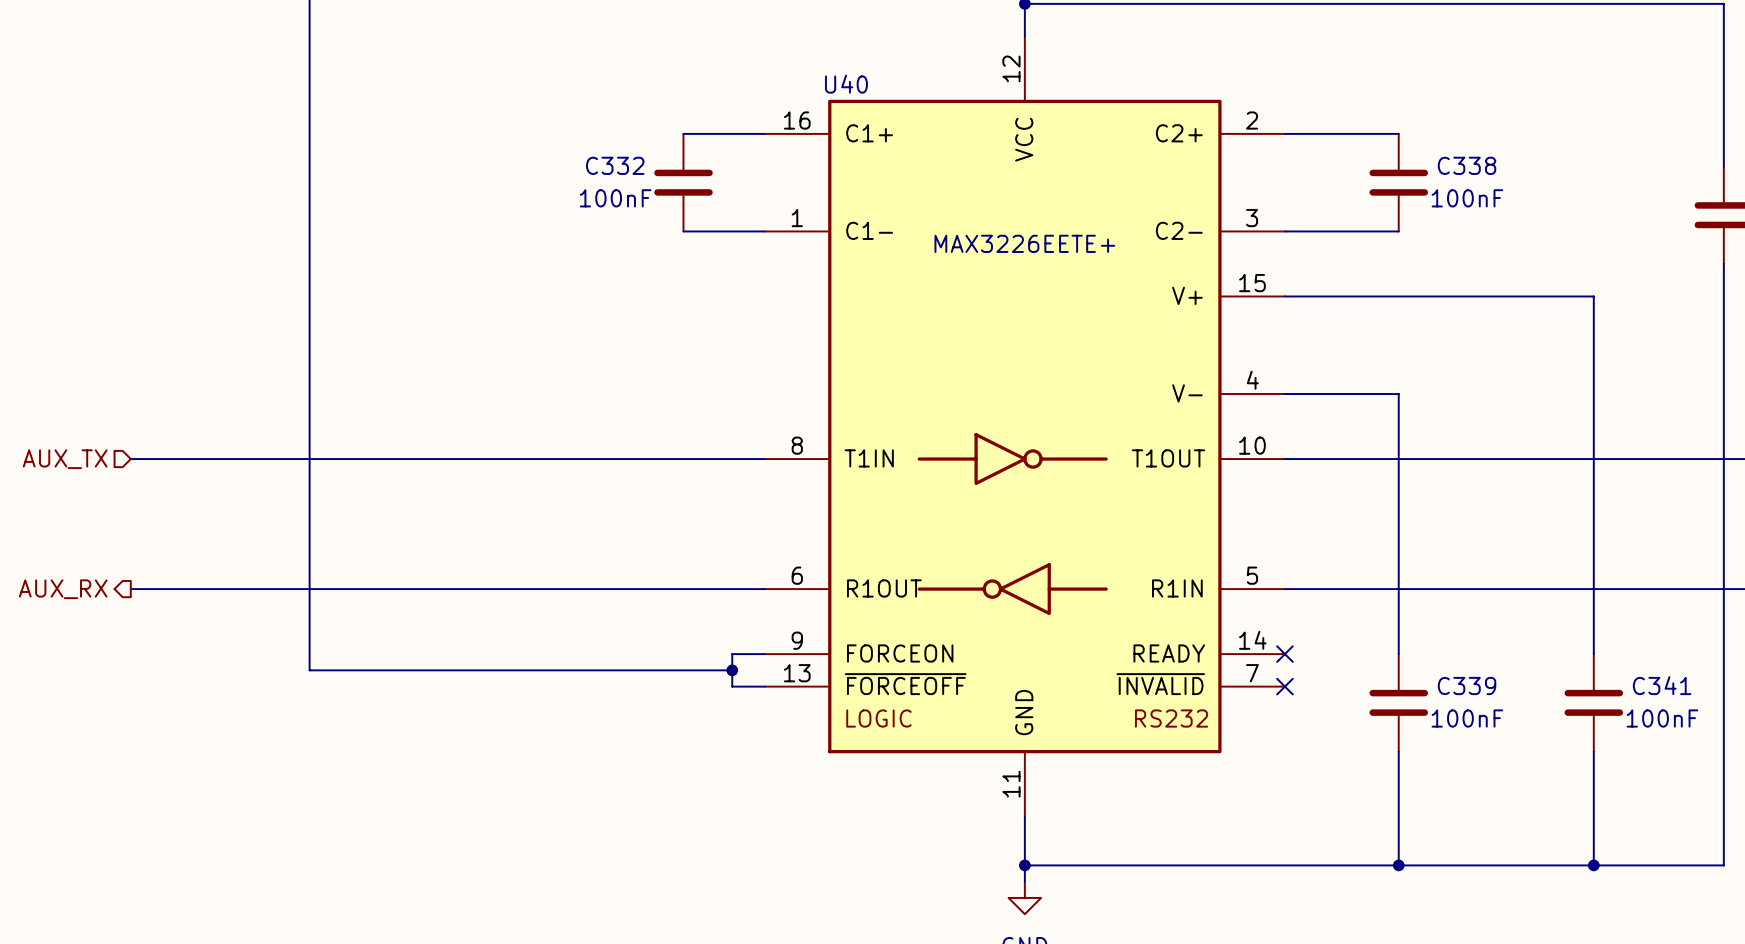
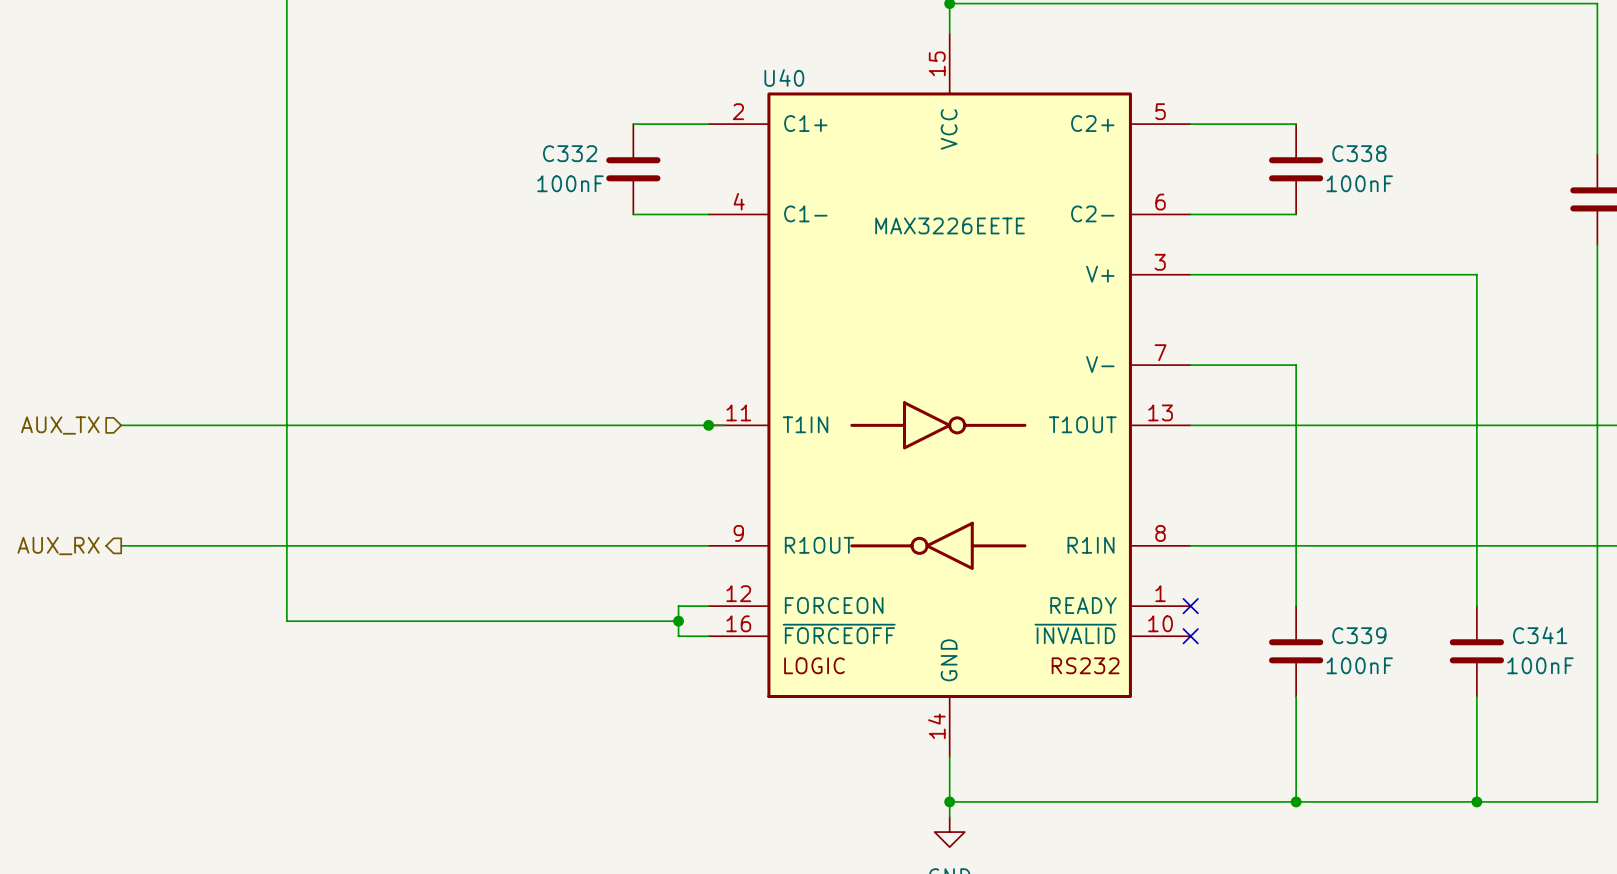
U40 symbol: [764, 36, 1285, 817] -> [708, 33, 1191, 757]
U40 value: MAX3226EETE+ (1024, 243) -> MAX3226EETE (950, 225)
junction: none -> (708, 425)

